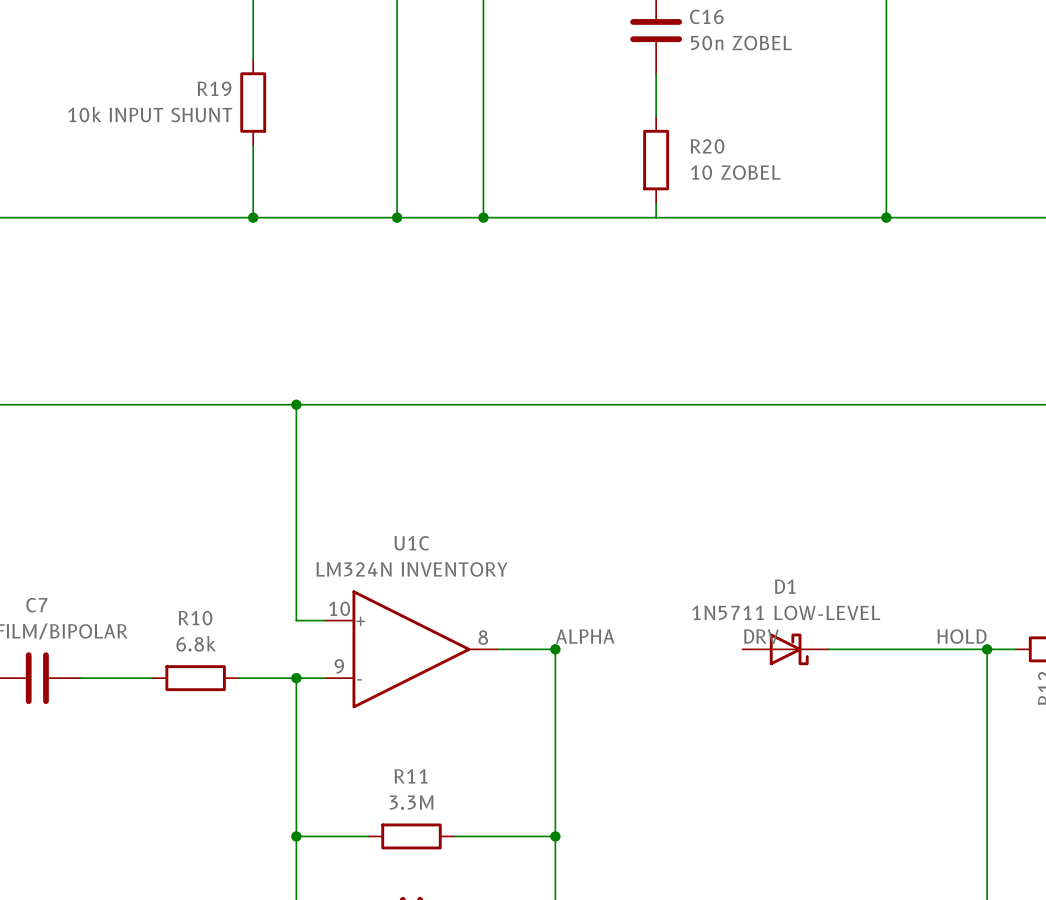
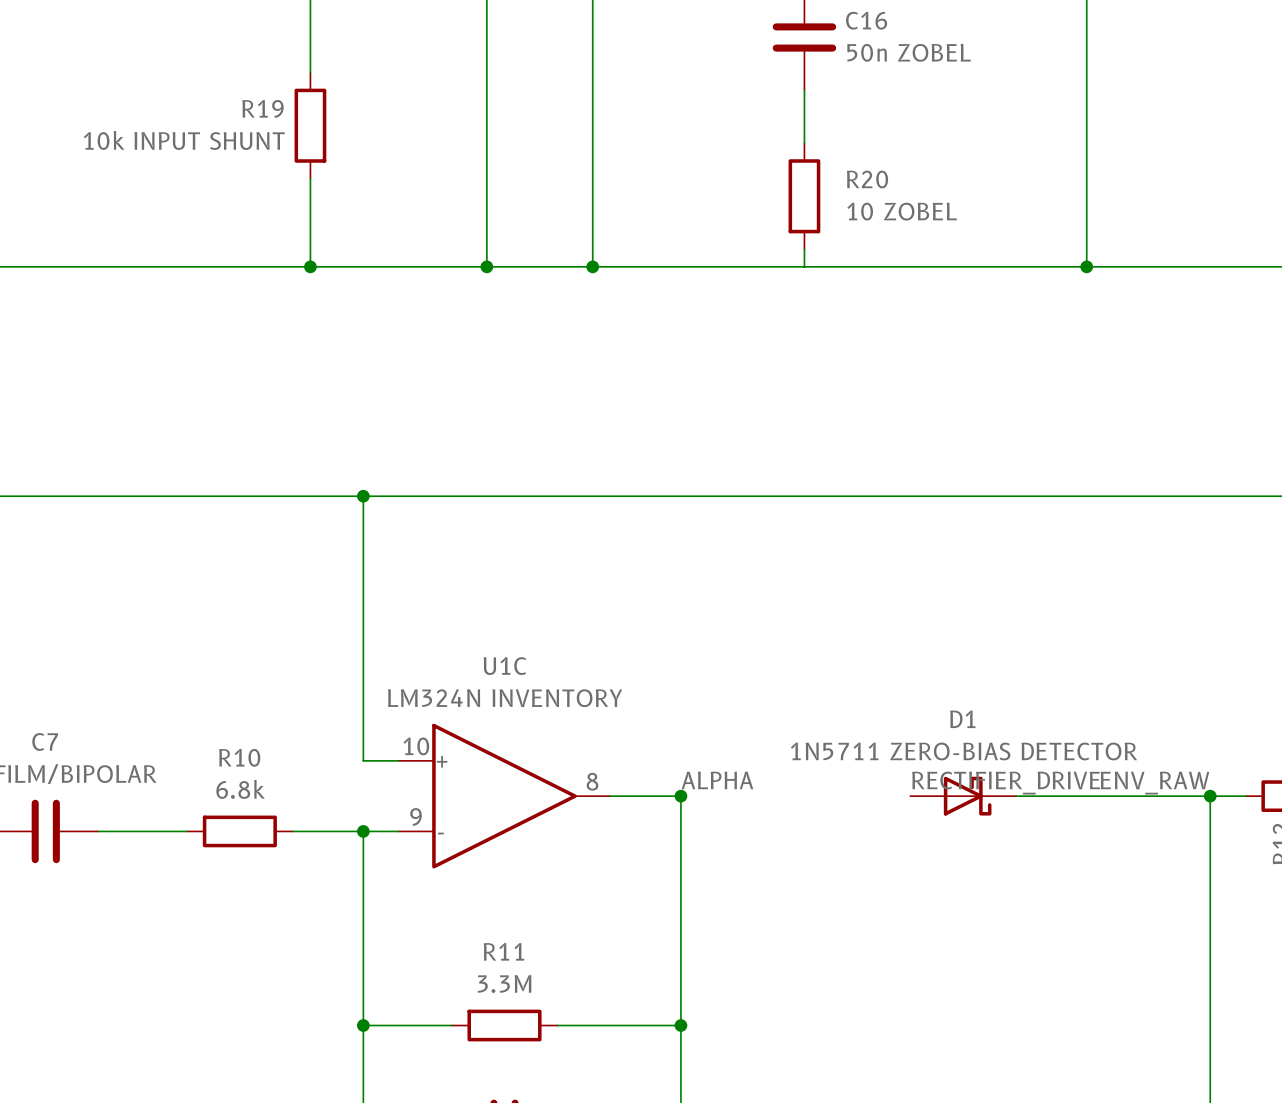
D1 value: 1N5711 LOW-LEVEL (786, 612) -> 1N5711 ZERO-BIAS DETECTOR (963, 751)
label: DRV (761, 636) -> RECTIFIER_DRIVE (1006, 783)
label: HOLD (961, 636) -> ENV_RAW (1154, 783)

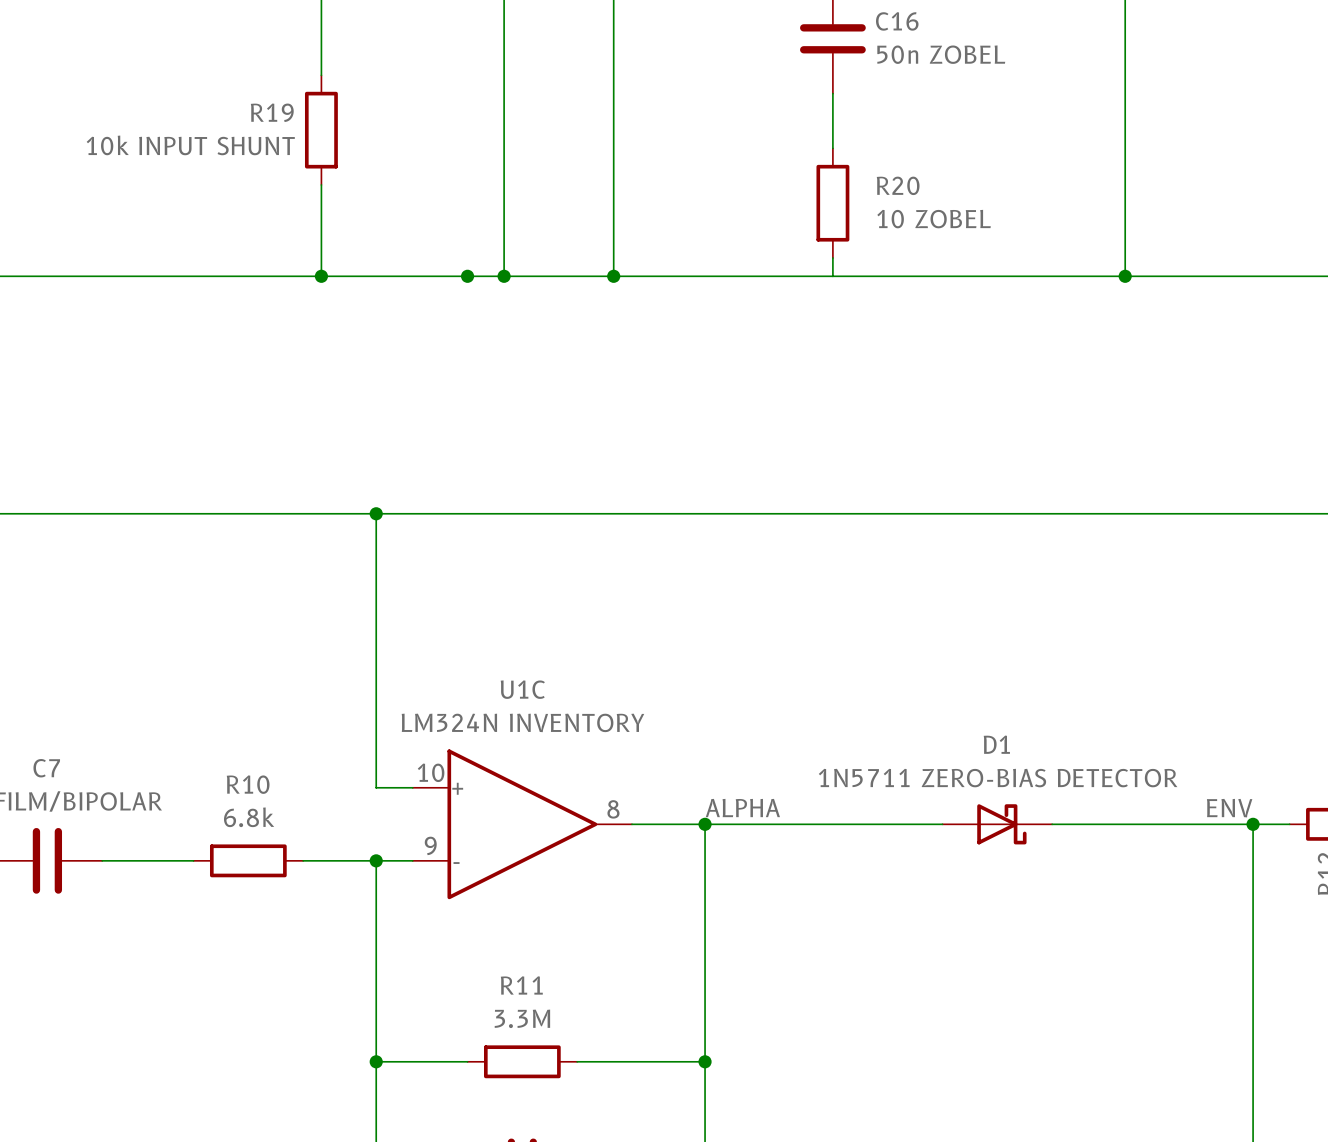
junction: none -> (467, 276)
label: RECTIFIER_DRIVE (1006, 783) -> none
label: ENV_RAW (1154, 783) -> ENV (1229, 808)
wire: none -> (705, 824) (942, 824)

